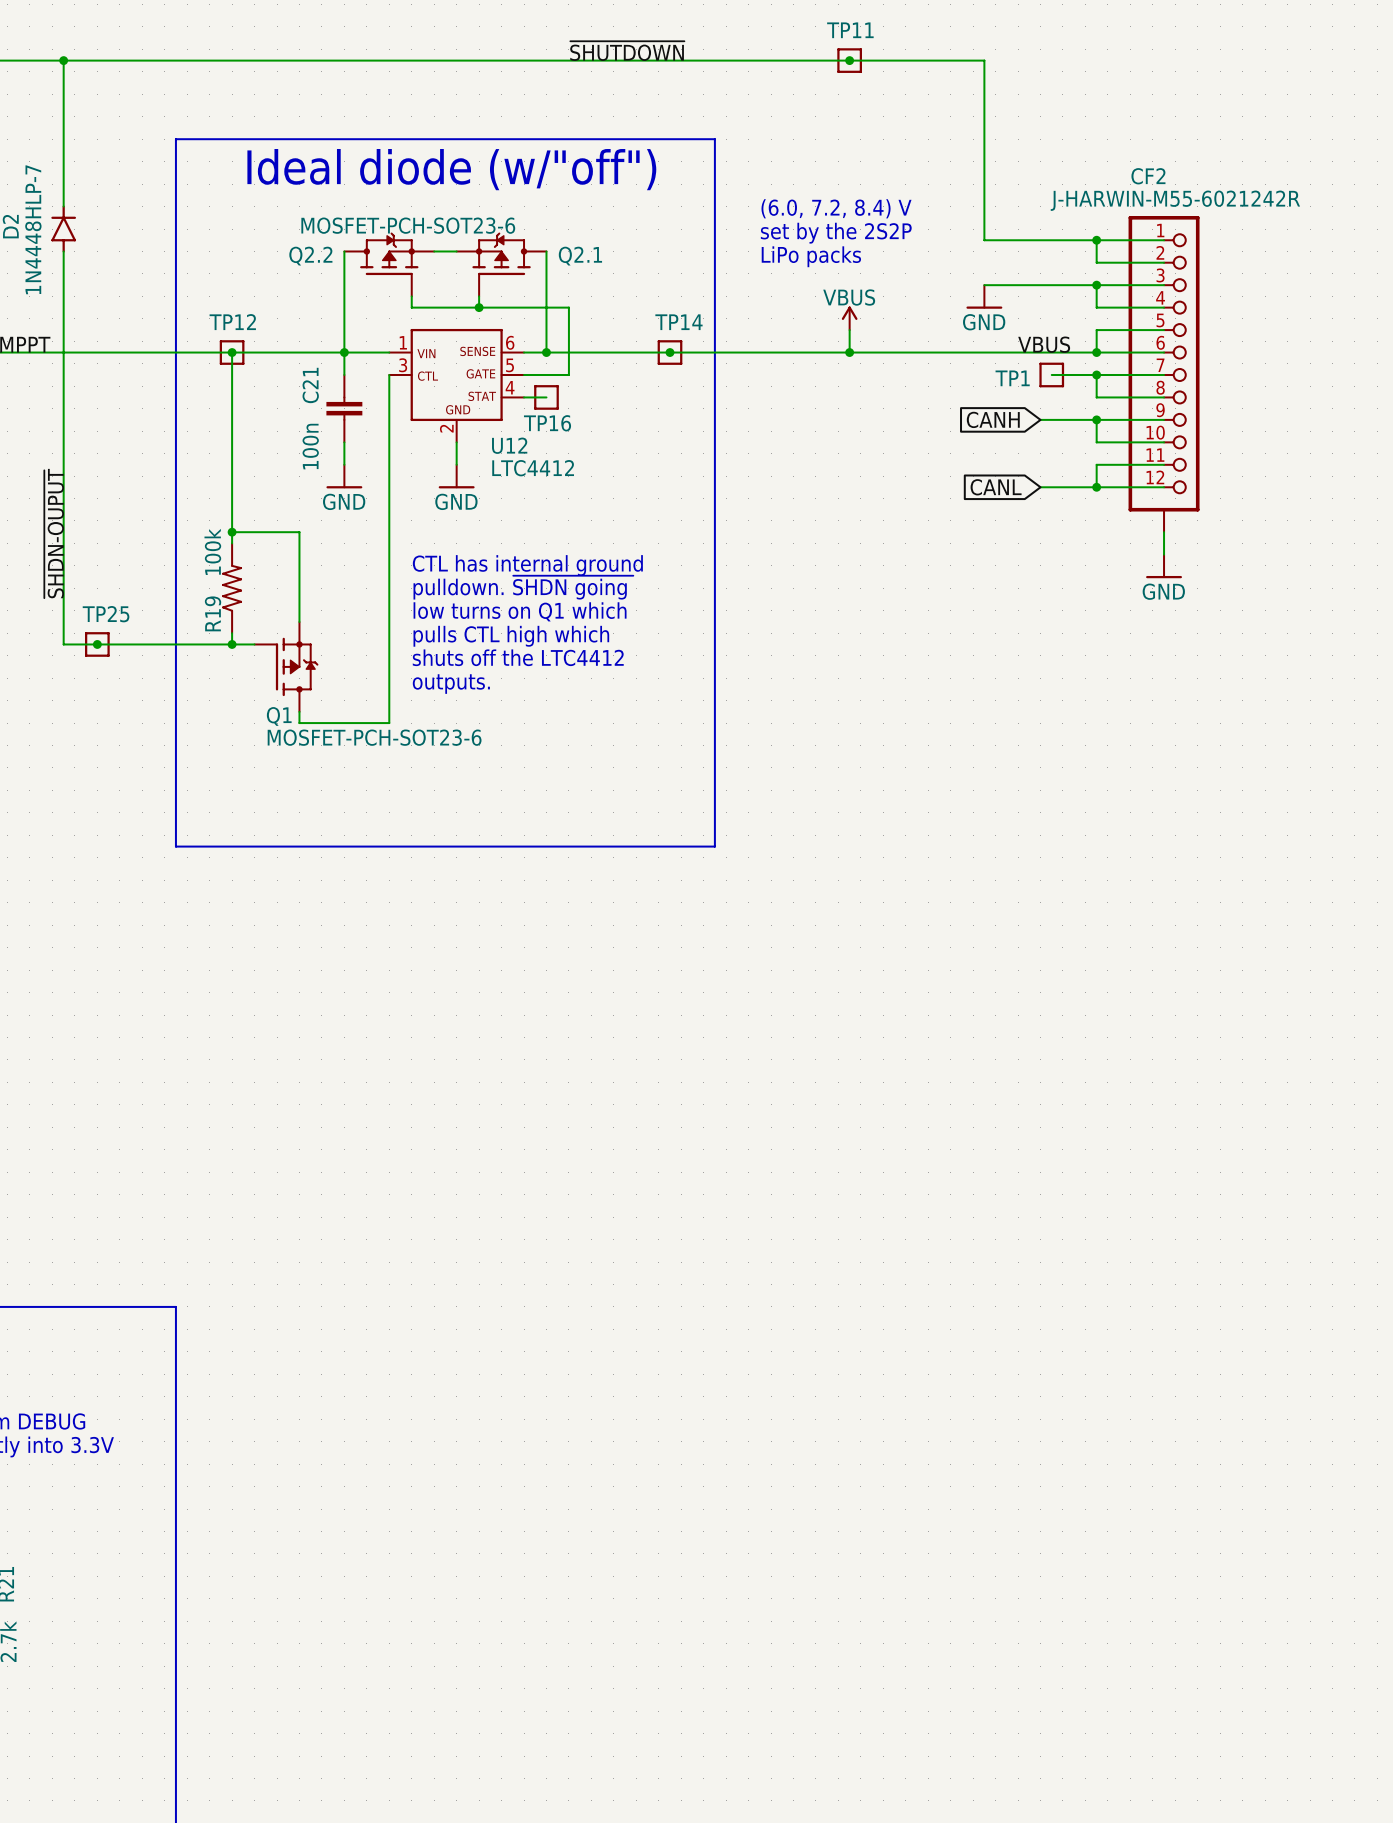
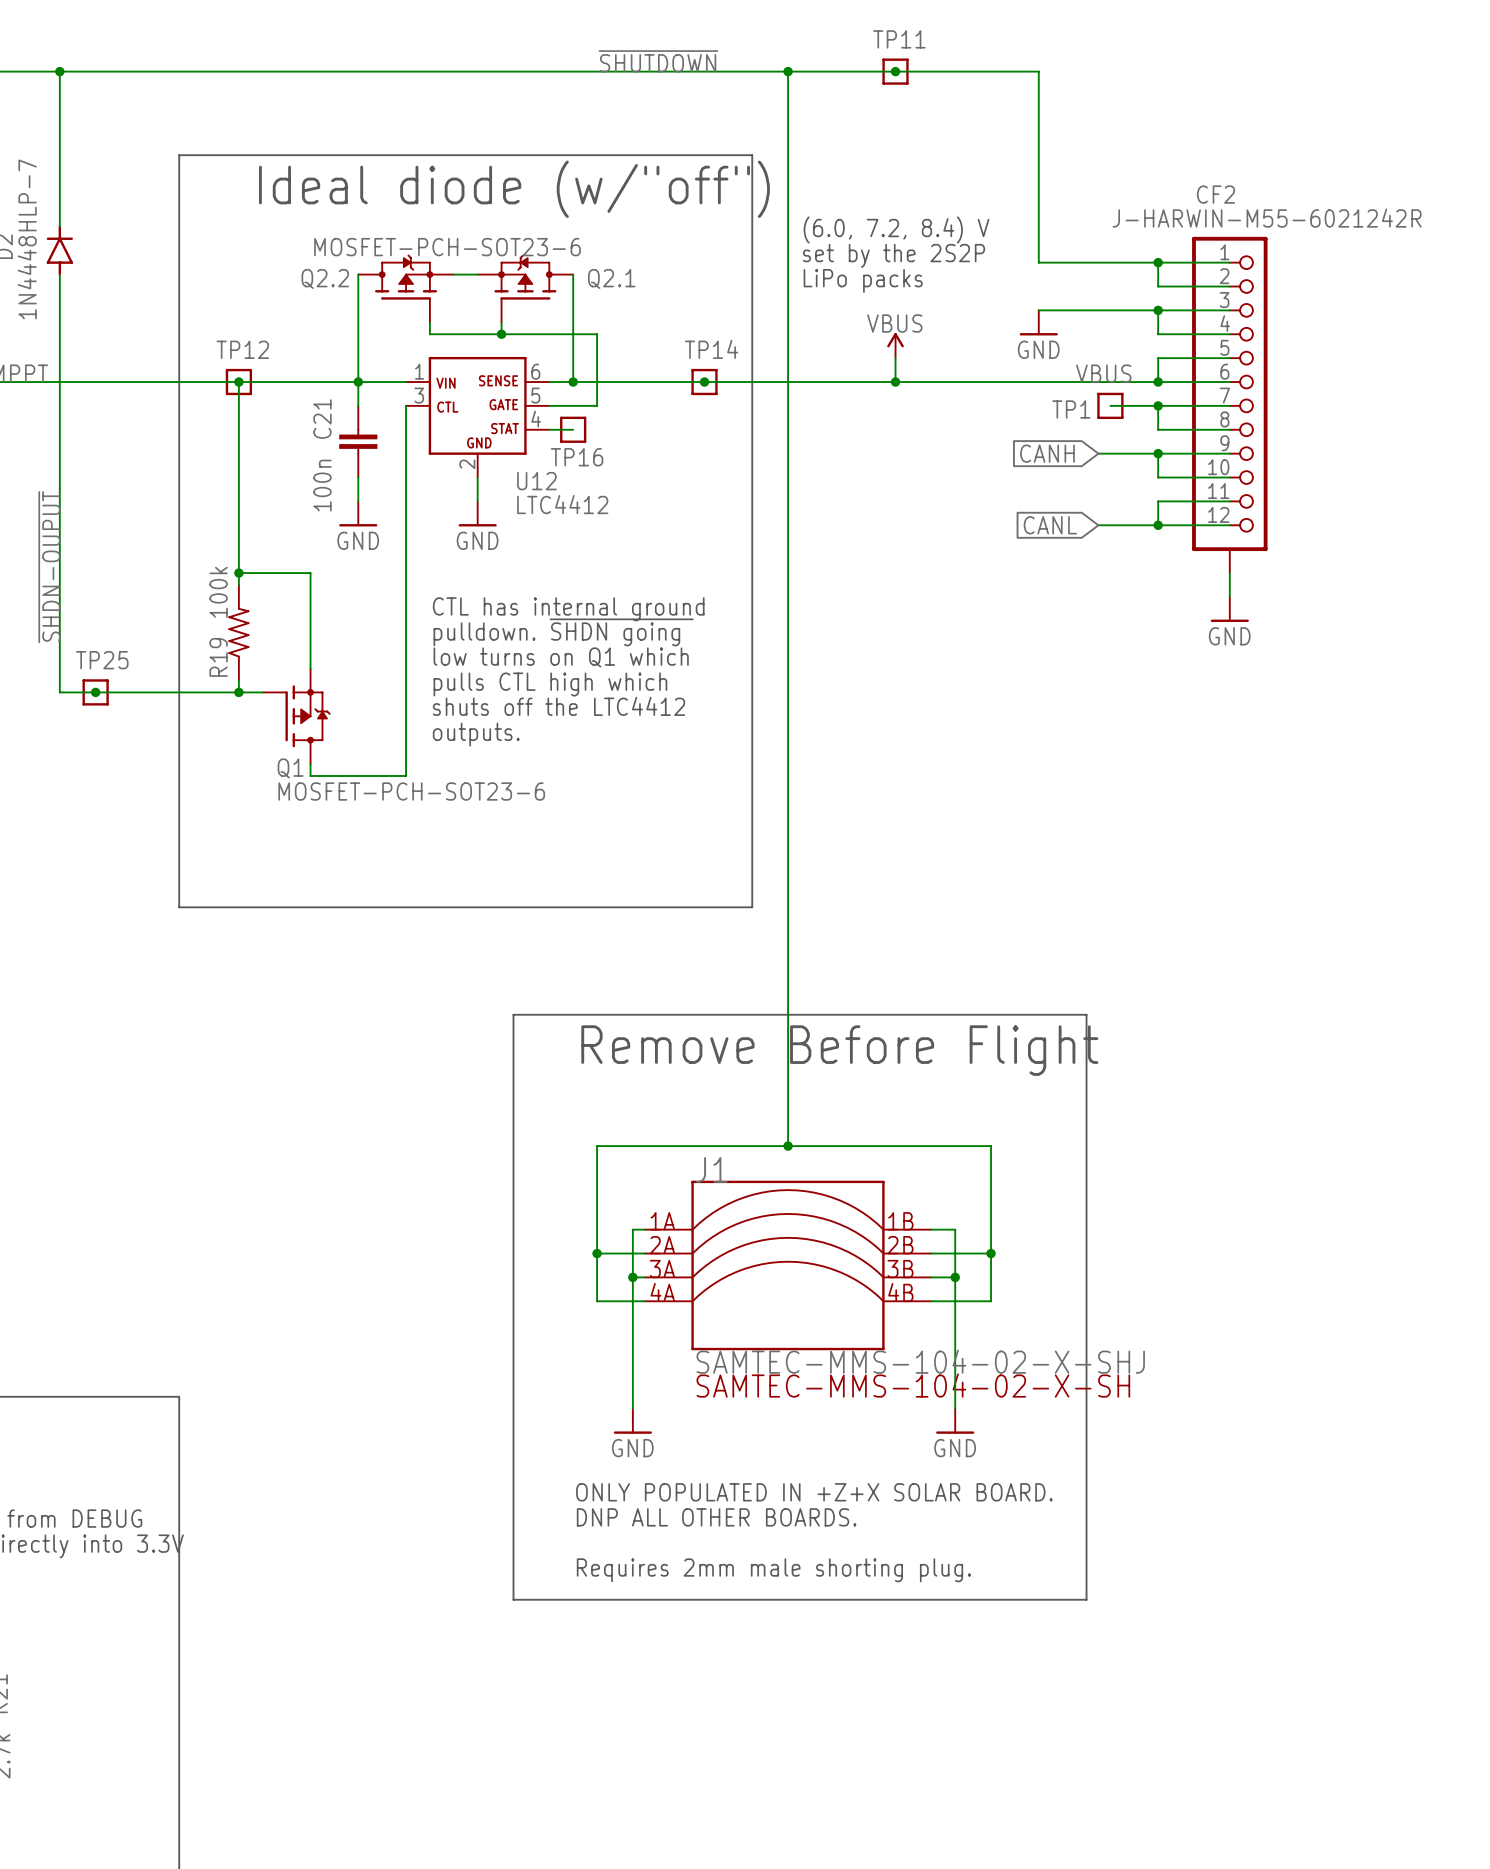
wire: none -> (788, 71) (788, 1146)
junction: none -> (788, 71)
line: none -> (513, 1014) (513, 1599) (1086, 1599) (1086, 1014) (513, 1014)
text: none -> Remove Before Flight (839, 1050)
junction: none -> (788, 1146)
wire: none -> (644, 1229) (632, 1229) (632, 1408)
wire: none -> (931, 1229) (955, 1229) (955, 1408)
wire: none -> (597, 1253) (644, 1253)
junction: none -> (597, 1253)
wire: none -> (931, 1253) (991, 1253)
junction: none -> (991, 1253)
J1: none -> SAMTEC-MMS-104-02-X-SHJ (788, 1265)
wire: none -> (632, 1277) (644, 1277)
junction: none -> (632, 1277)
wire: none -> (931, 1277) (955, 1277)
junction: none -> (955, 1277)
wire: none -> (644, 1301) (597, 1301) (597, 1146) (991, 1146) (991, 1301) (931, 1301)
power symbol: none -> GND (632, 1421)
power symbol: none -> GND (955, 1421)
text: none -> ONLY POPULATED IN +Z+X SOLAR BOARD. (814, 1492)
text: none -> DNP ALL OTHER BOARDS. (716, 1517)
text: none -> Requires 2mm male shorting plug. (773, 1570)

